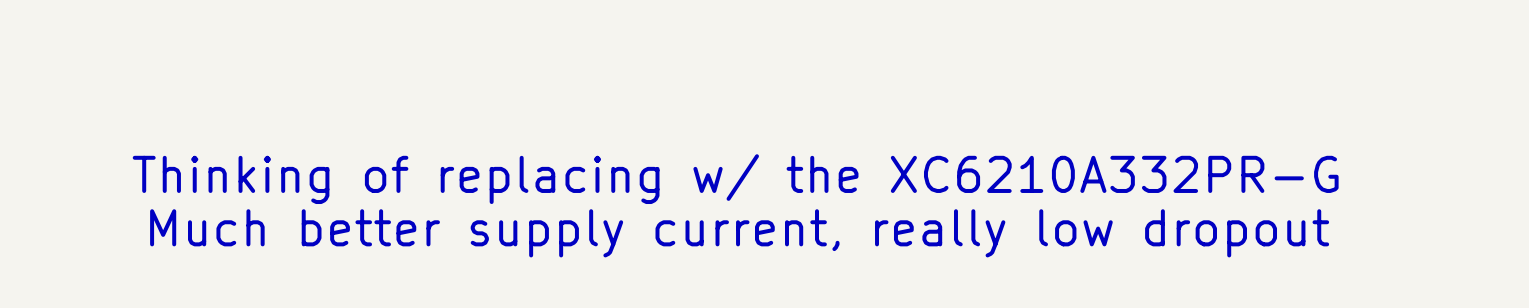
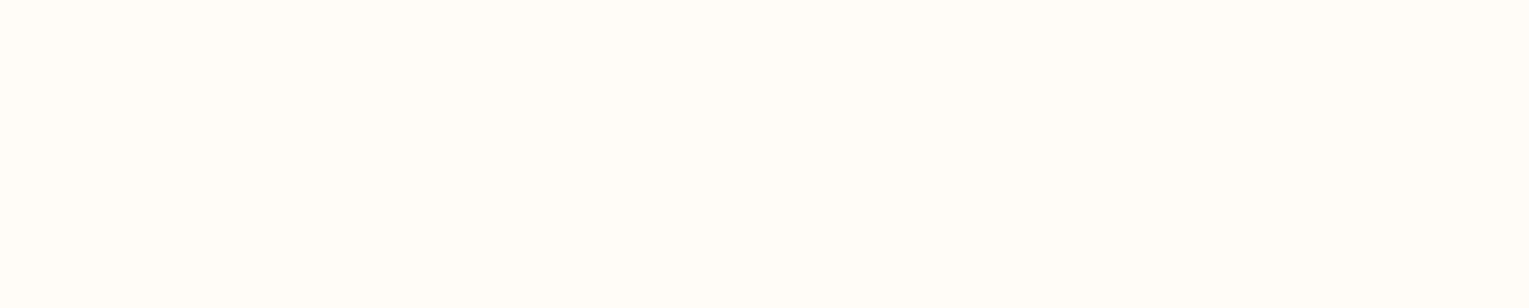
text: Thinking of replacing w/ the XC6210A332PR-G (735, 179) -> none
text: Much better supply current, really low dropout (739, 233) -> none

